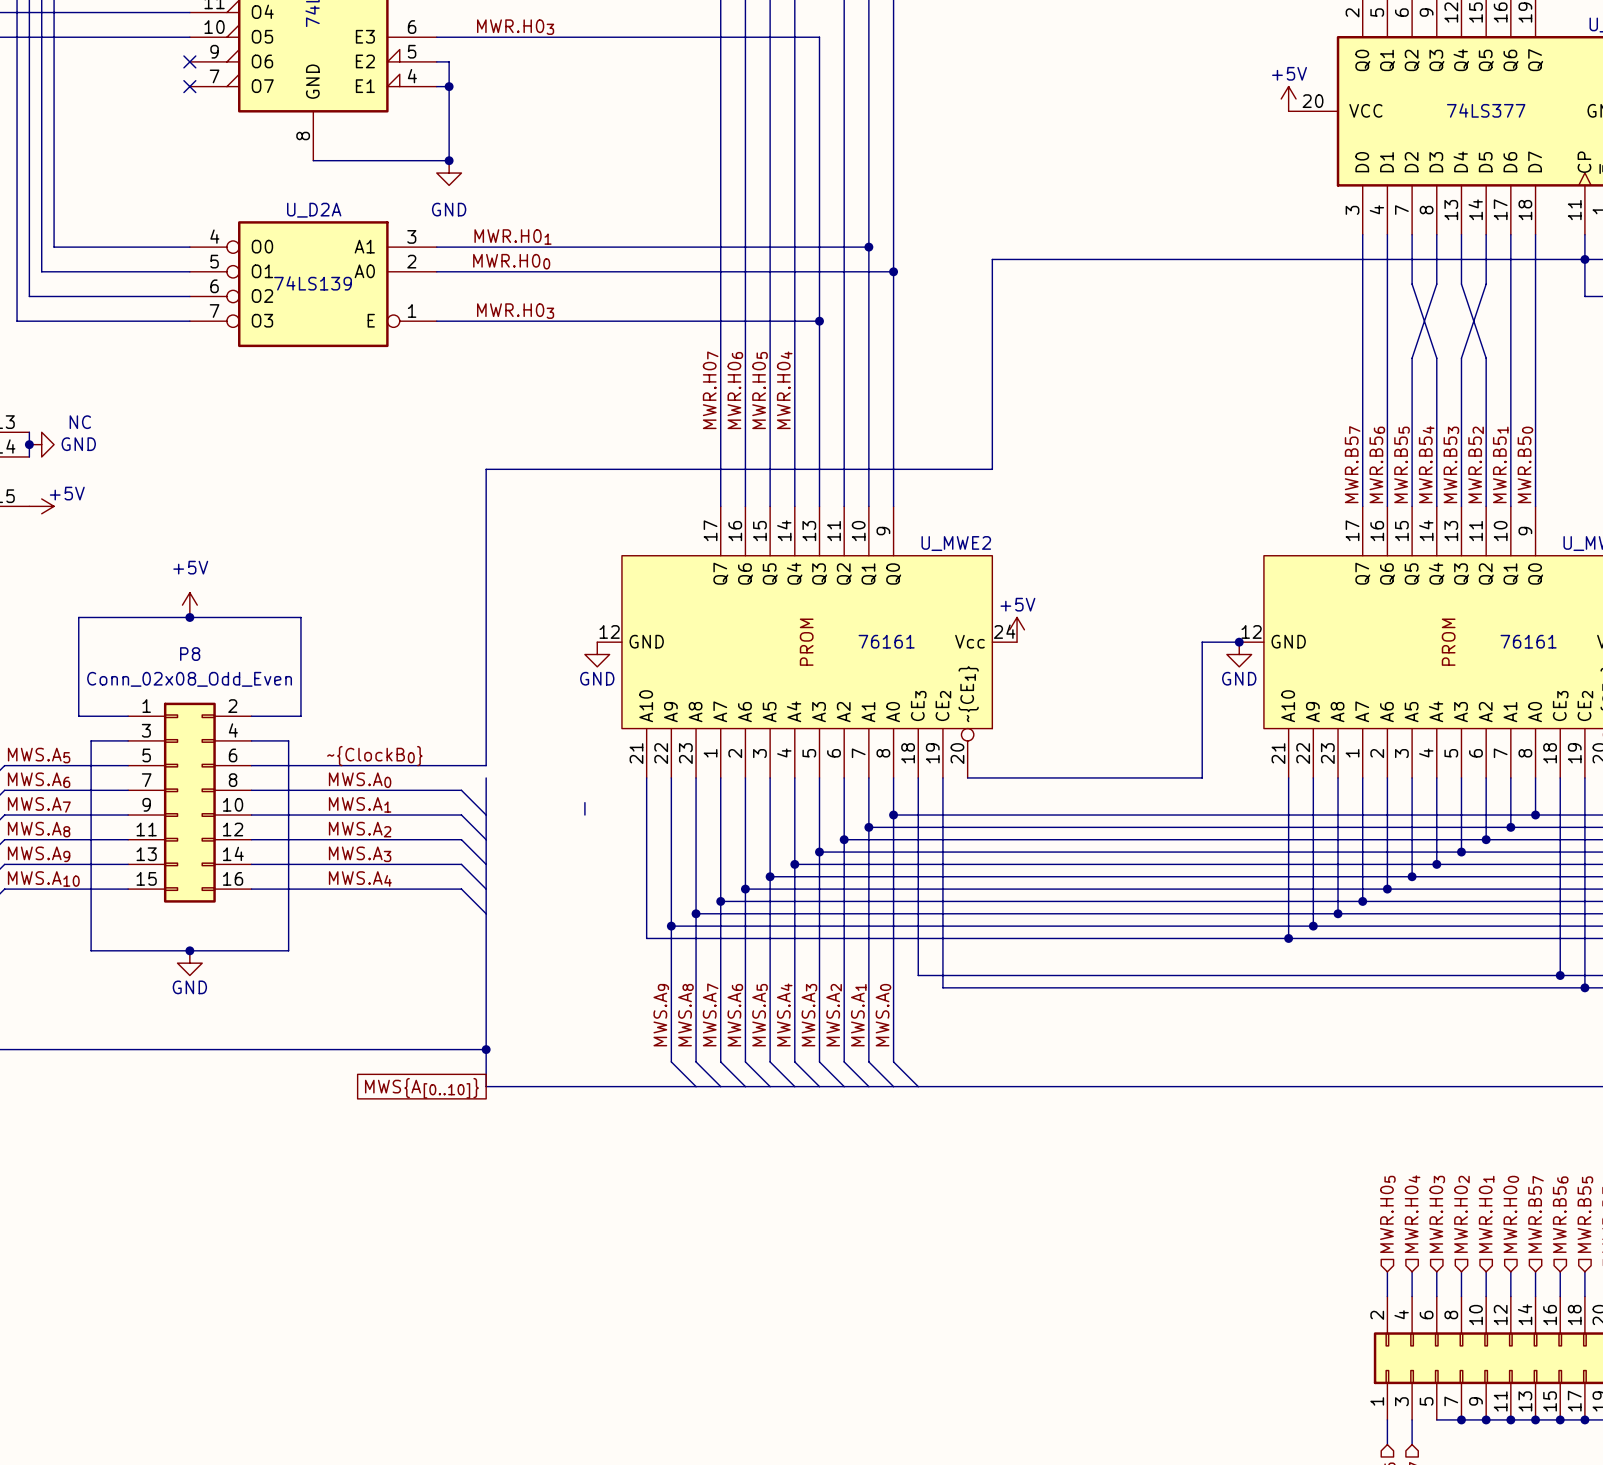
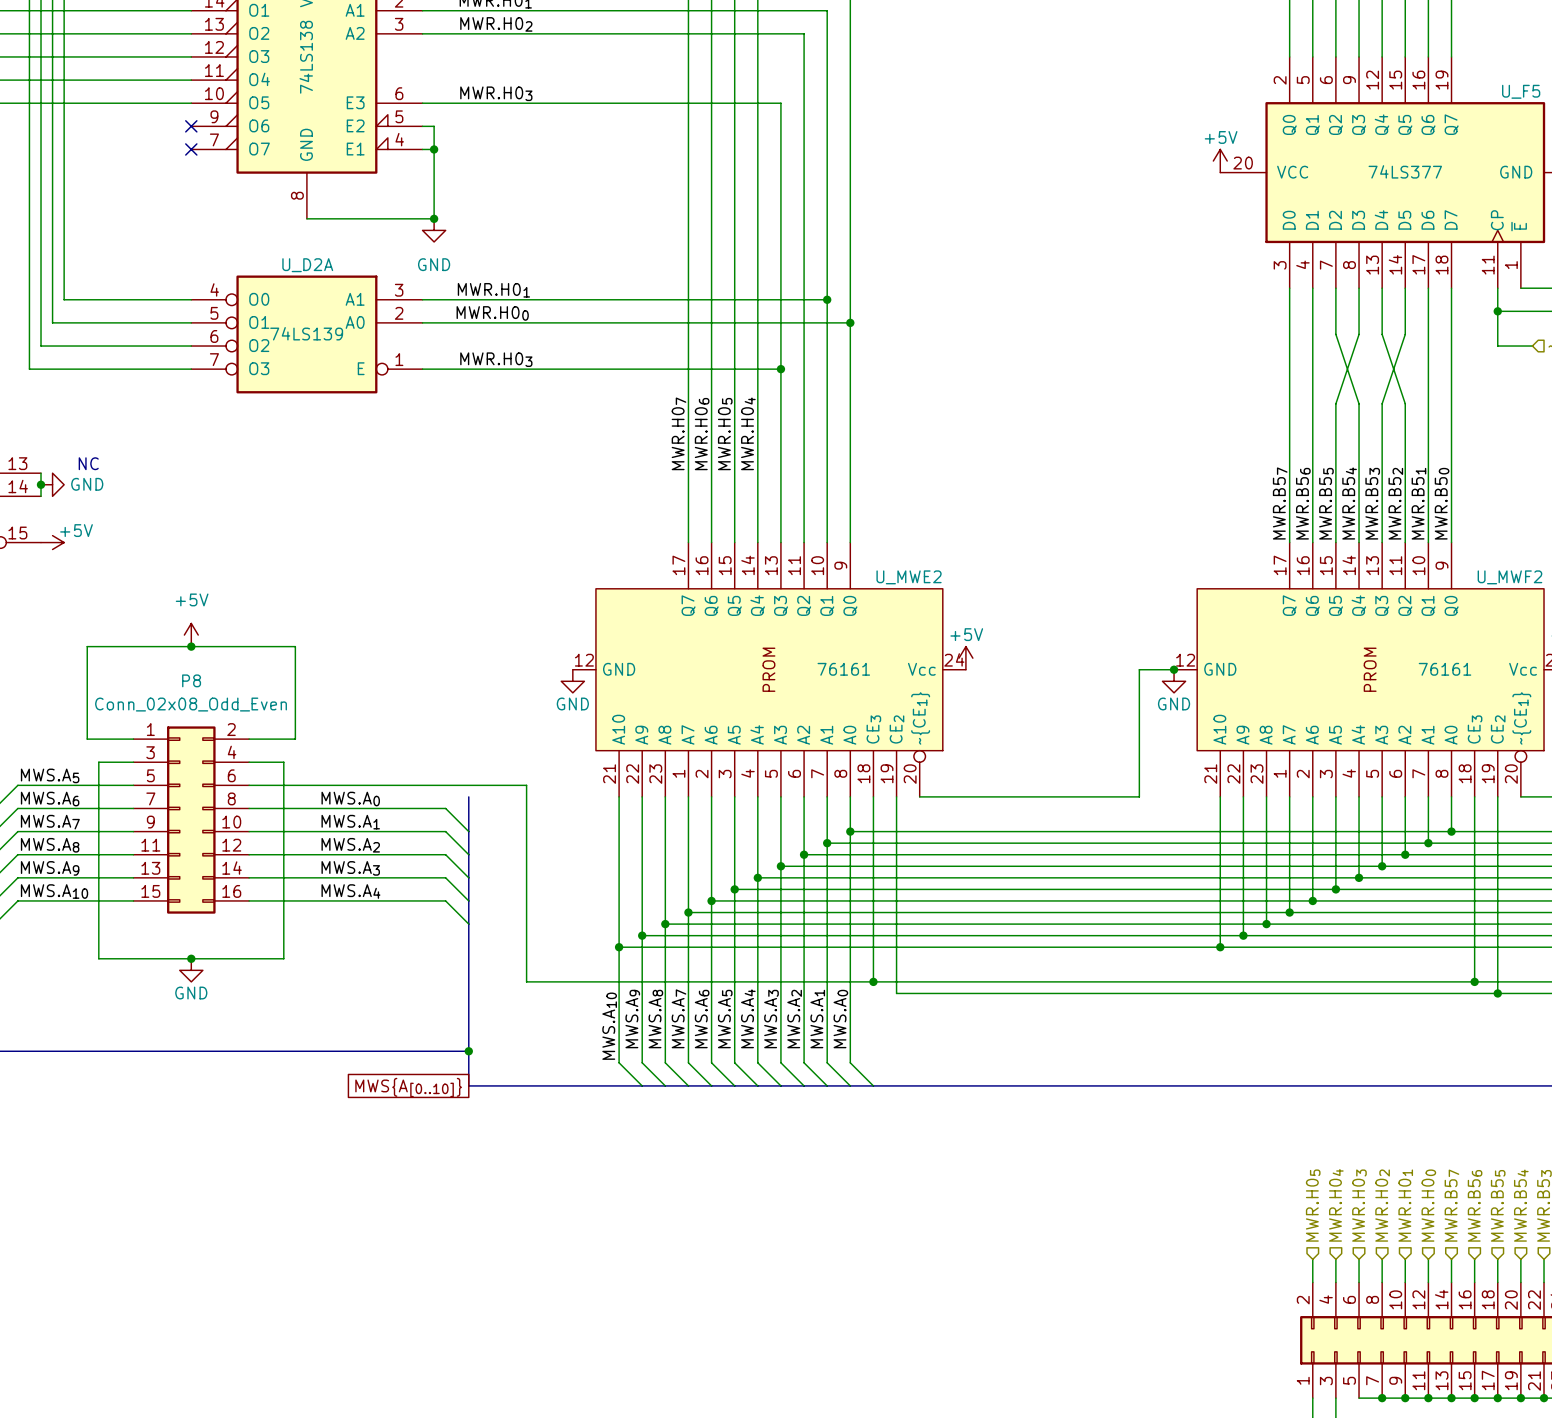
wire: (1584, 259) (992, 259) (992, 469) (486, 469) (486, 765) -> (873, 981) (526, 981) (526, 785) (468, 785)
label: ~{ClockB0} (374, 756) -> none
wire: (584, 802) (584, 815) -> none
wire: none -> (619, 947) (619, 1062) (642, 1085)
junction: none -> (619, 947)
junction: none -> (873, 981)
label: none -> MWS.A10 (609, 1026)

